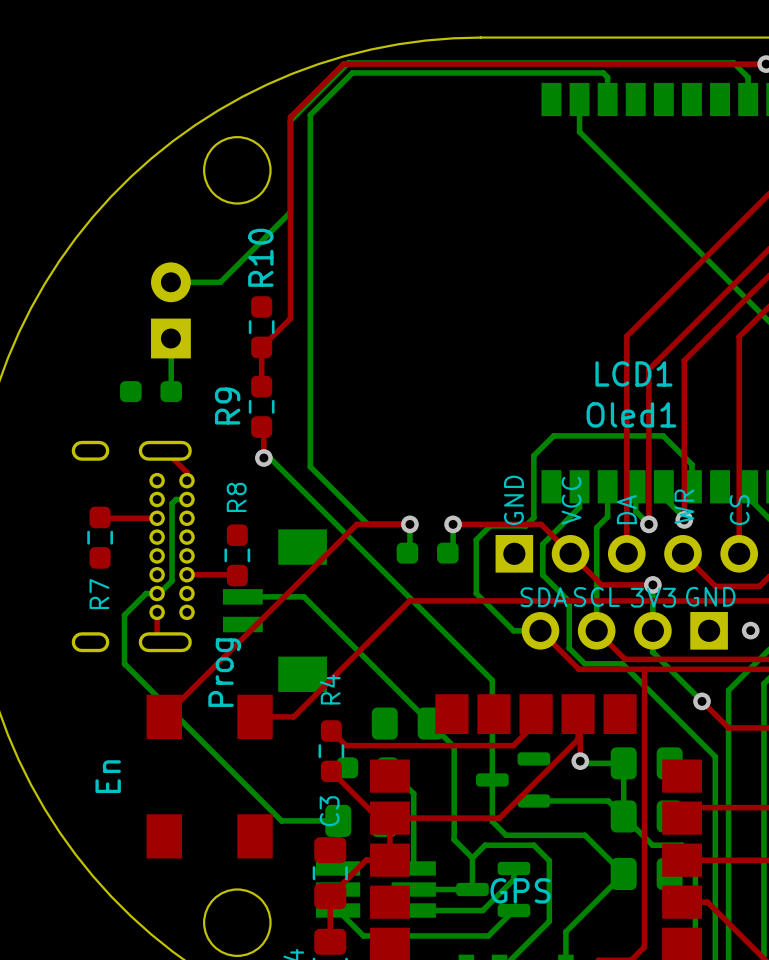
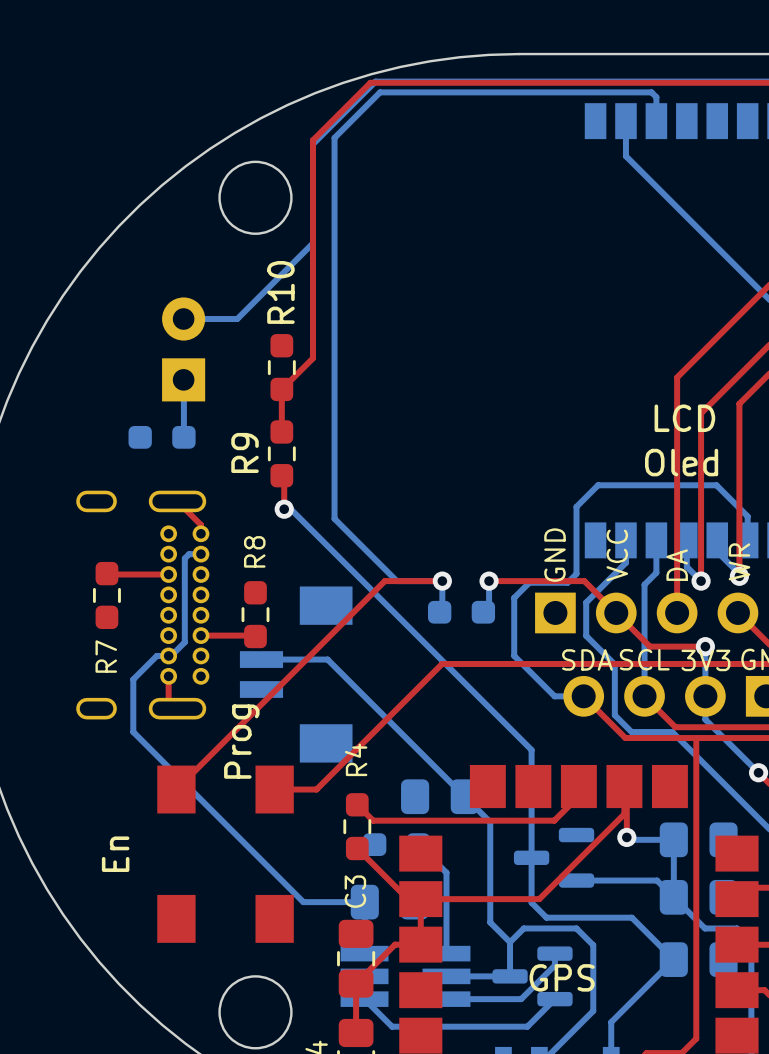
LCD1 name: LCD1 (633, 373) -> LCD (684, 418)
Oled1 name: Oled1 (631, 414) -> Oled (681, 462)

